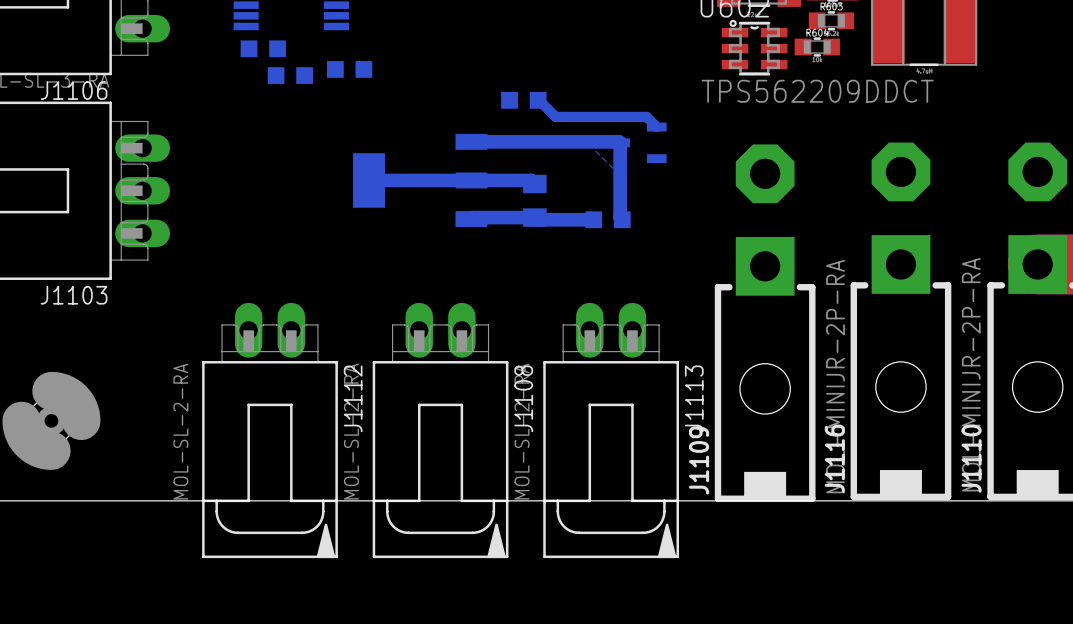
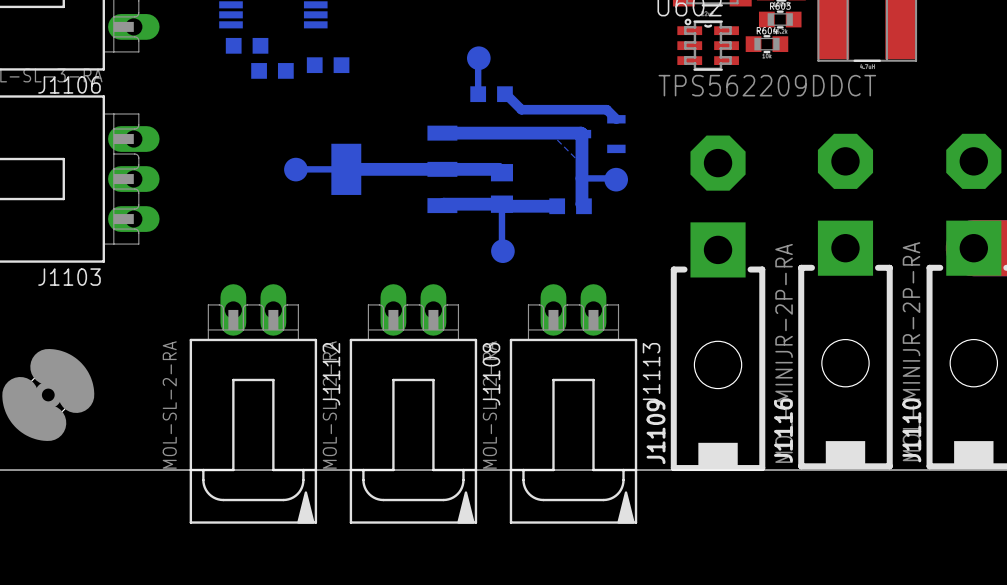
bottom track: none -> (478, 58) (478, 94)
part: none -> (478, 58)
bottom track: none -> (296, 169) (346, 169)
part: none -> (295, 169)
bottom track: none -> (581, 178) (616, 179)
part: none -> (616, 179)
bottom track: none -> (501, 204) (502, 251)
part: none -> (502, 251)

